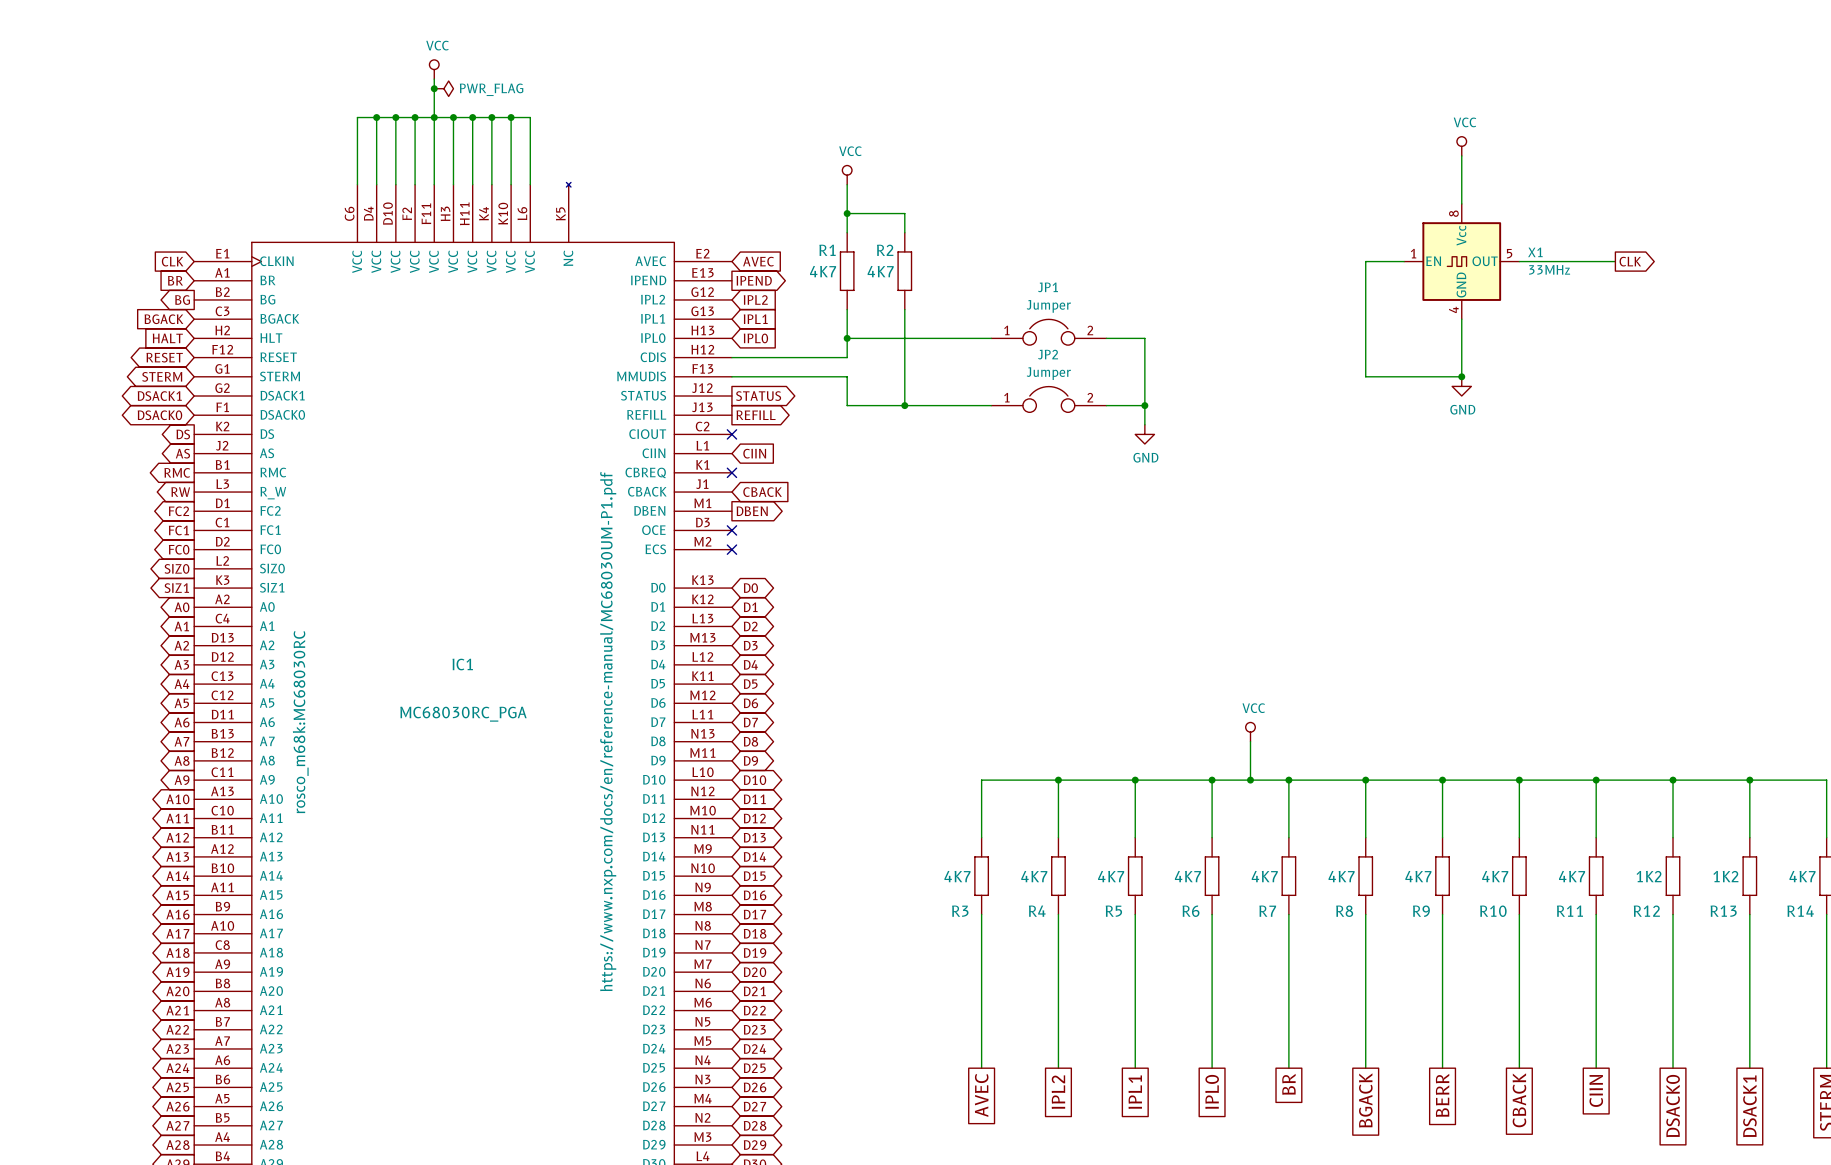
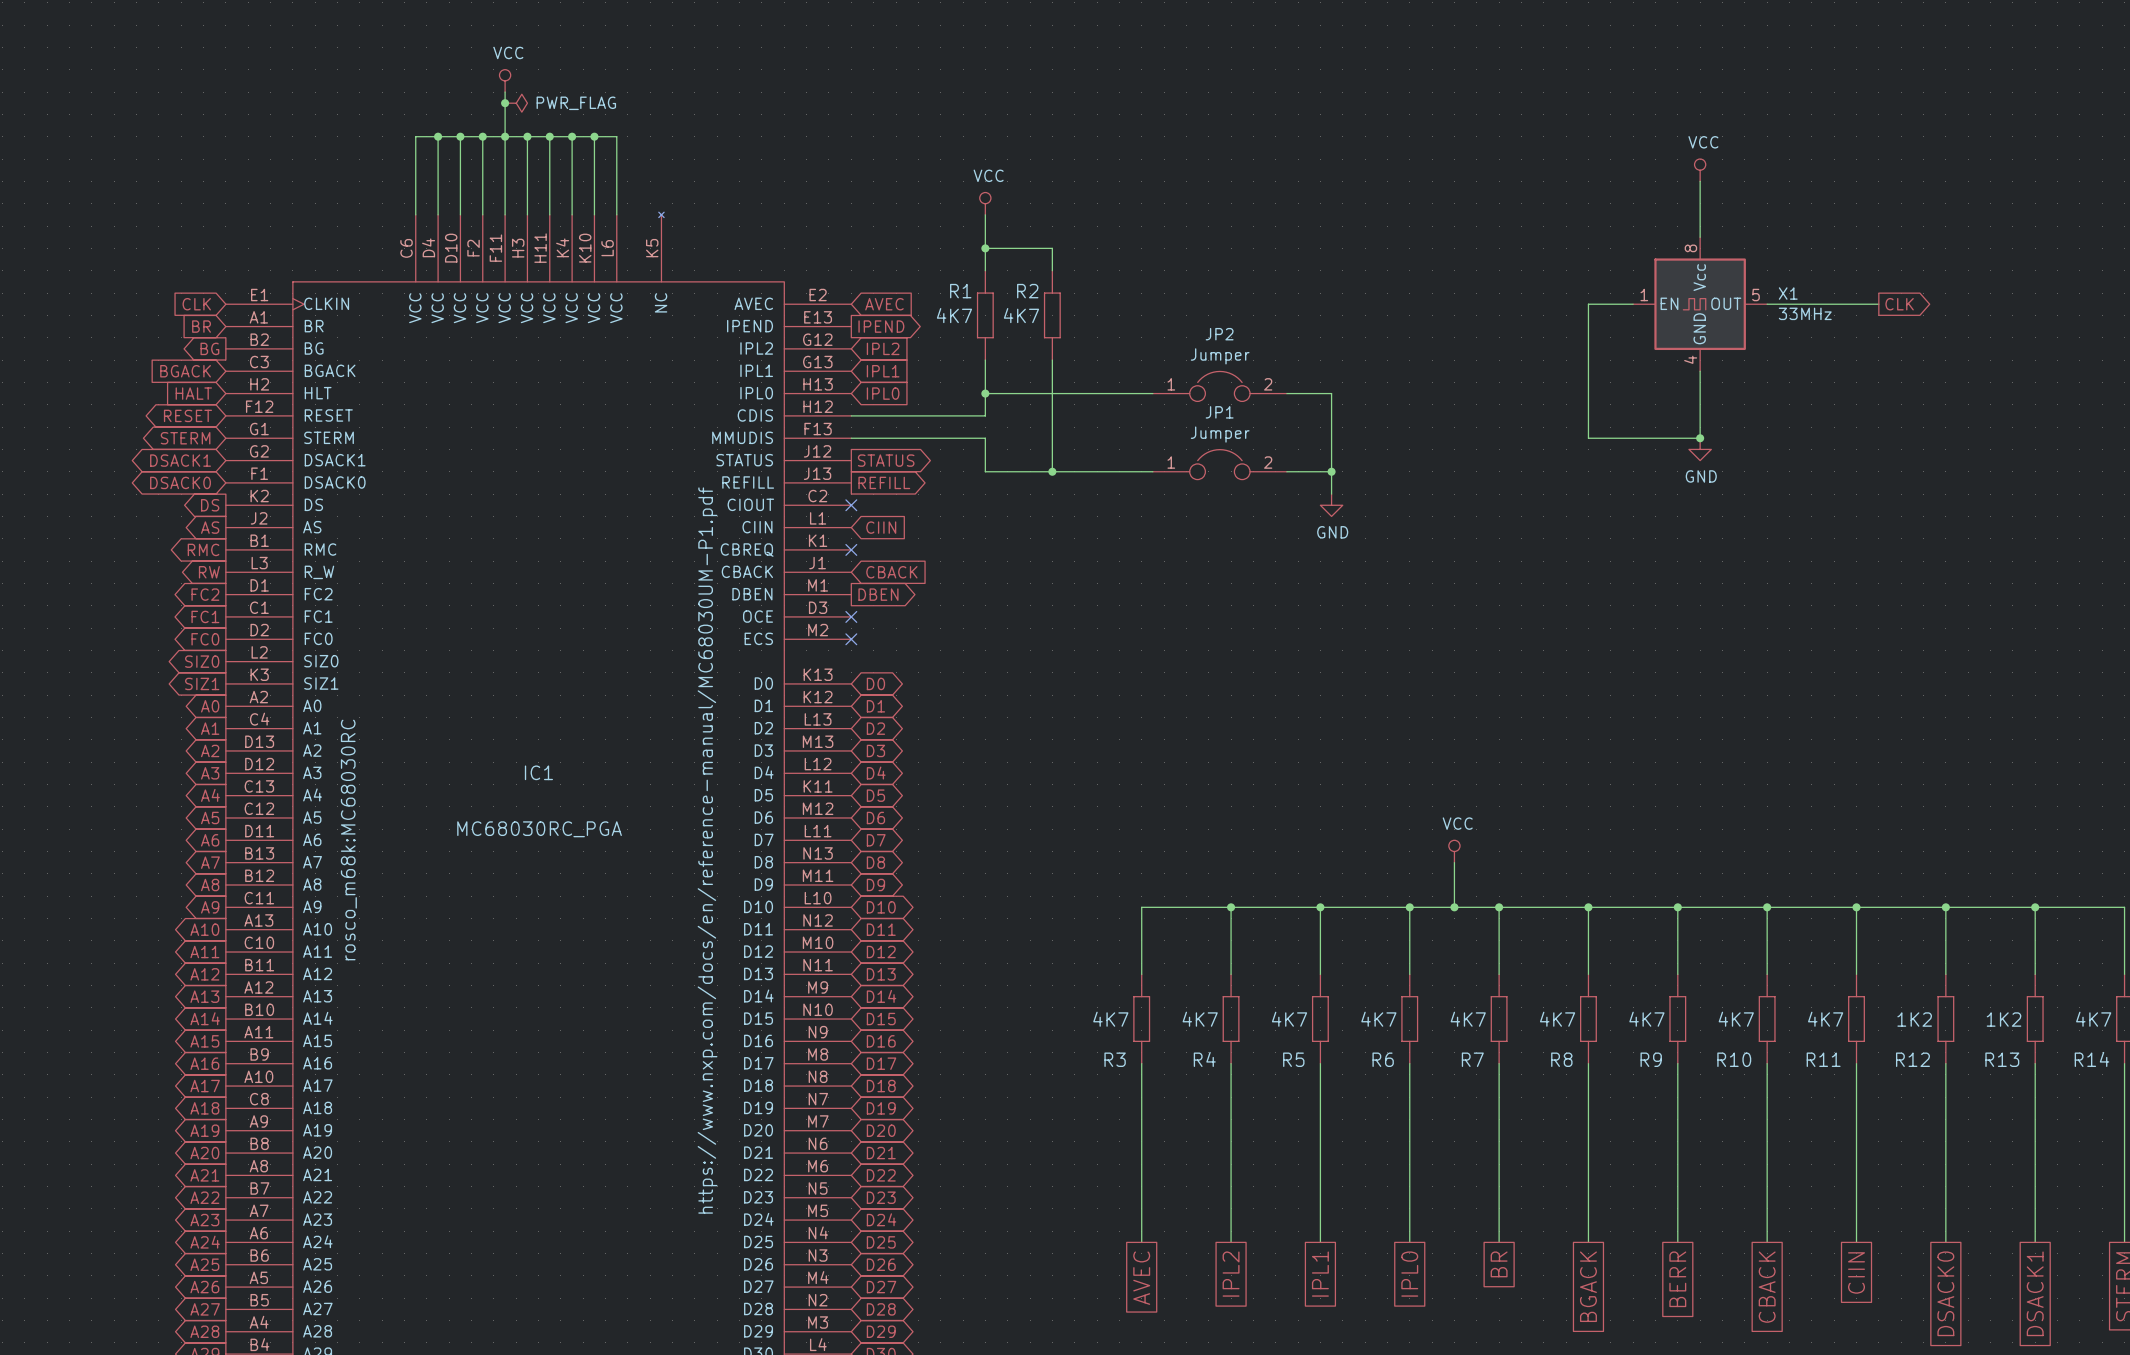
JP1 name: JP1 (1048, 287) -> JP2 (1219, 334)
JP2 name: JP2 (1048, 354) -> JP1 (1219, 412)

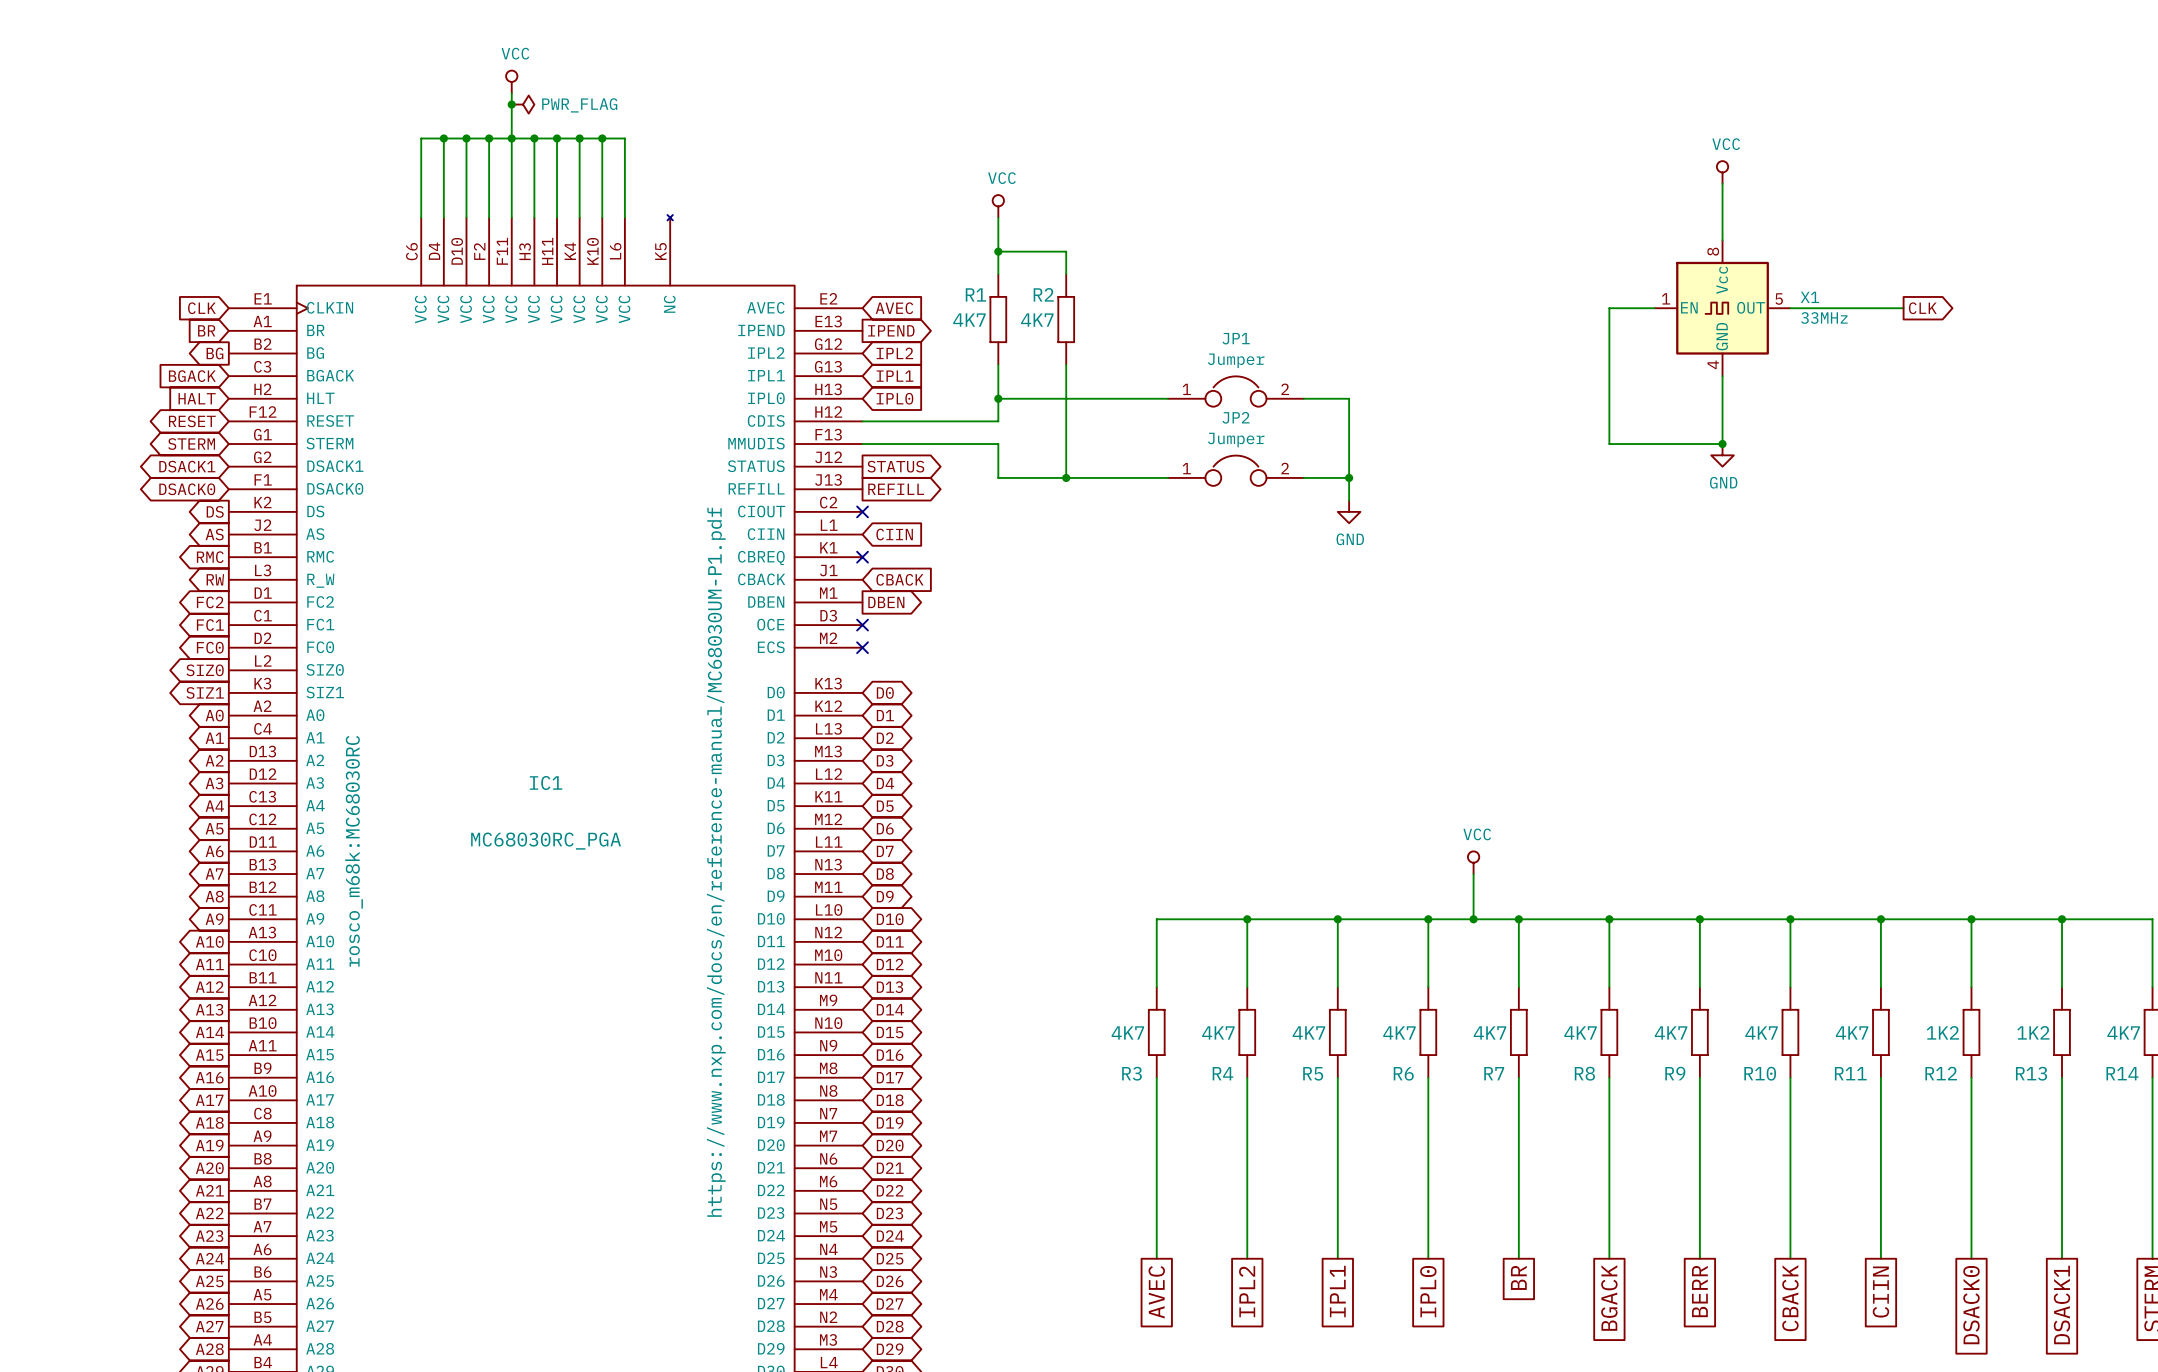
JP2 name: JP2 (1219, 334) -> JP1 (1236, 338)
JP1 name: JP1 (1219, 412) -> JP2 (1236, 417)

